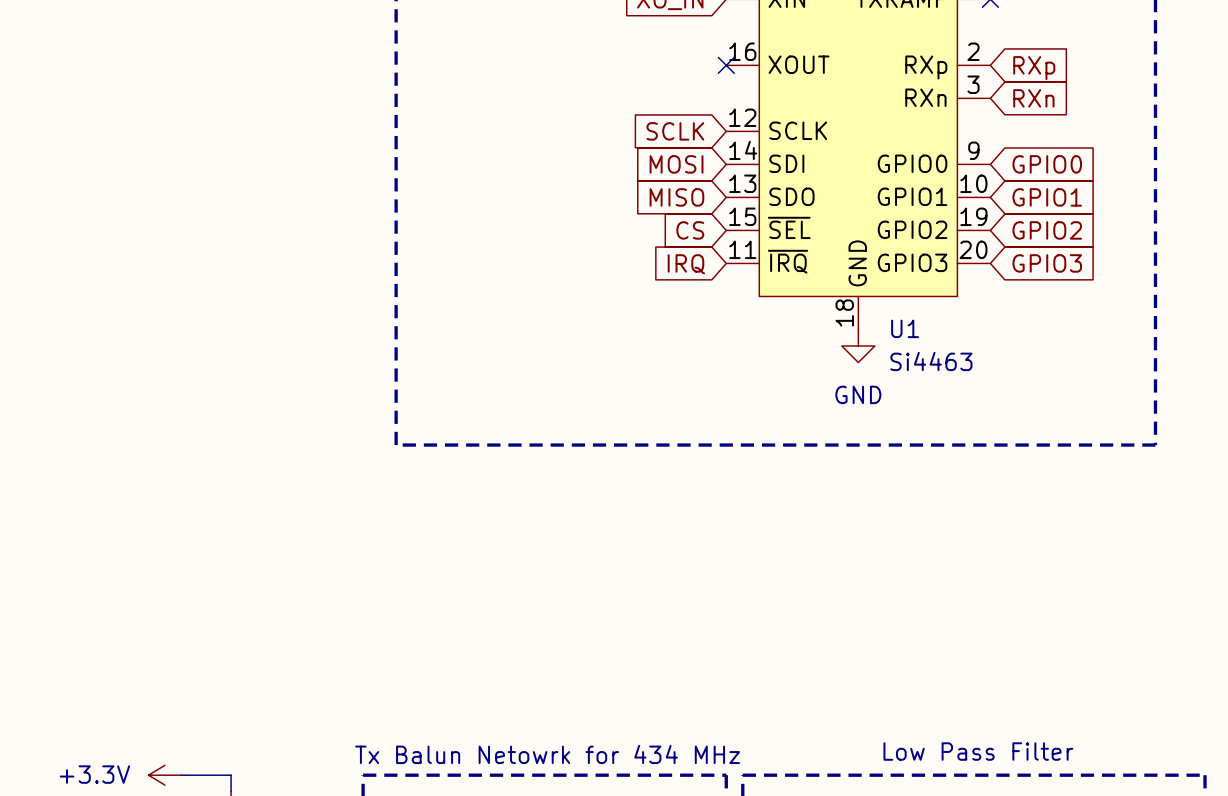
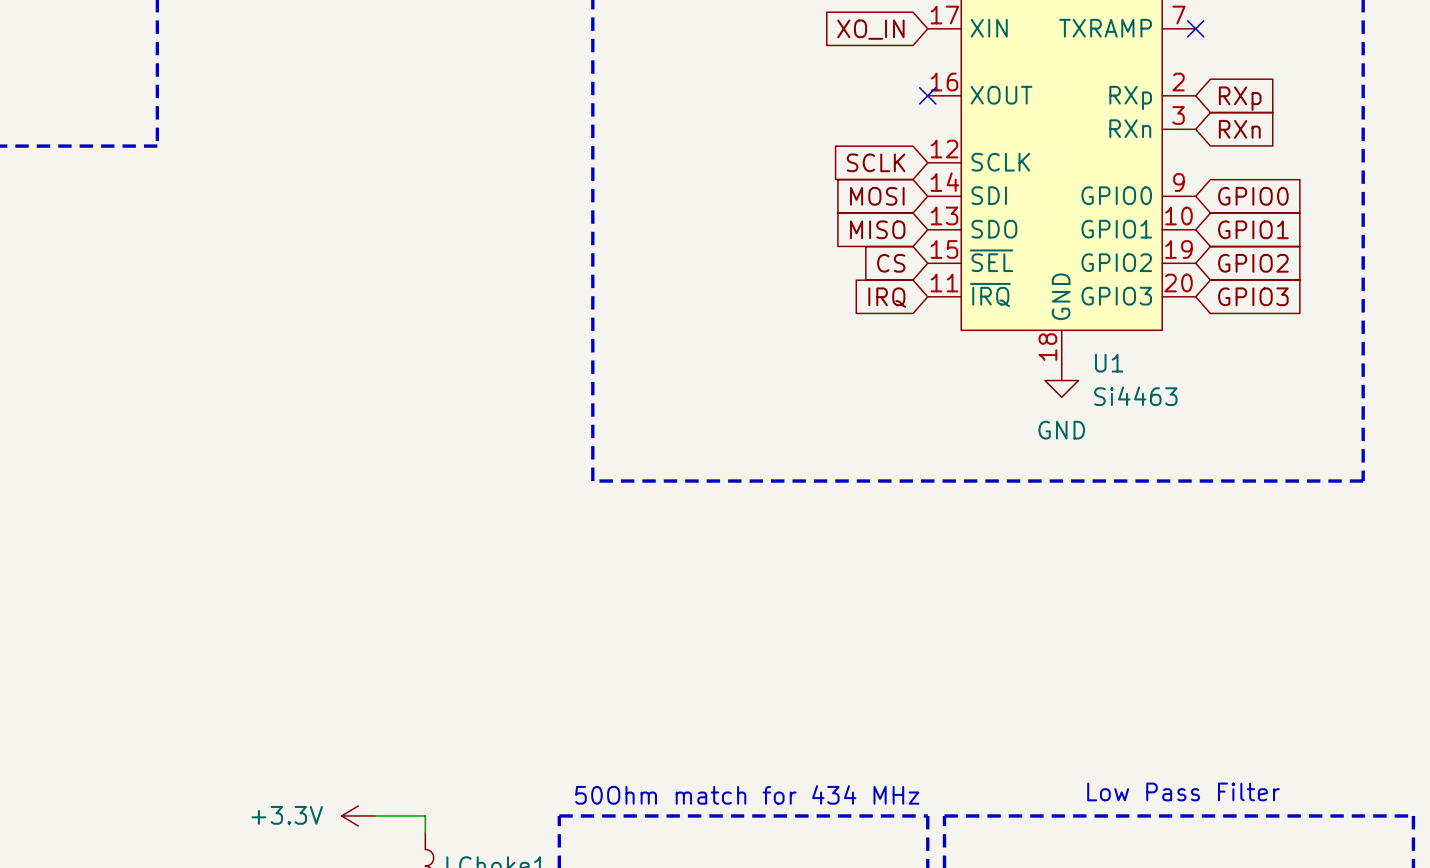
text: Tx Balun Netowrk for 434 MHz (547, 754) -> 50Ohm match for 434 MHz (747, 794)

